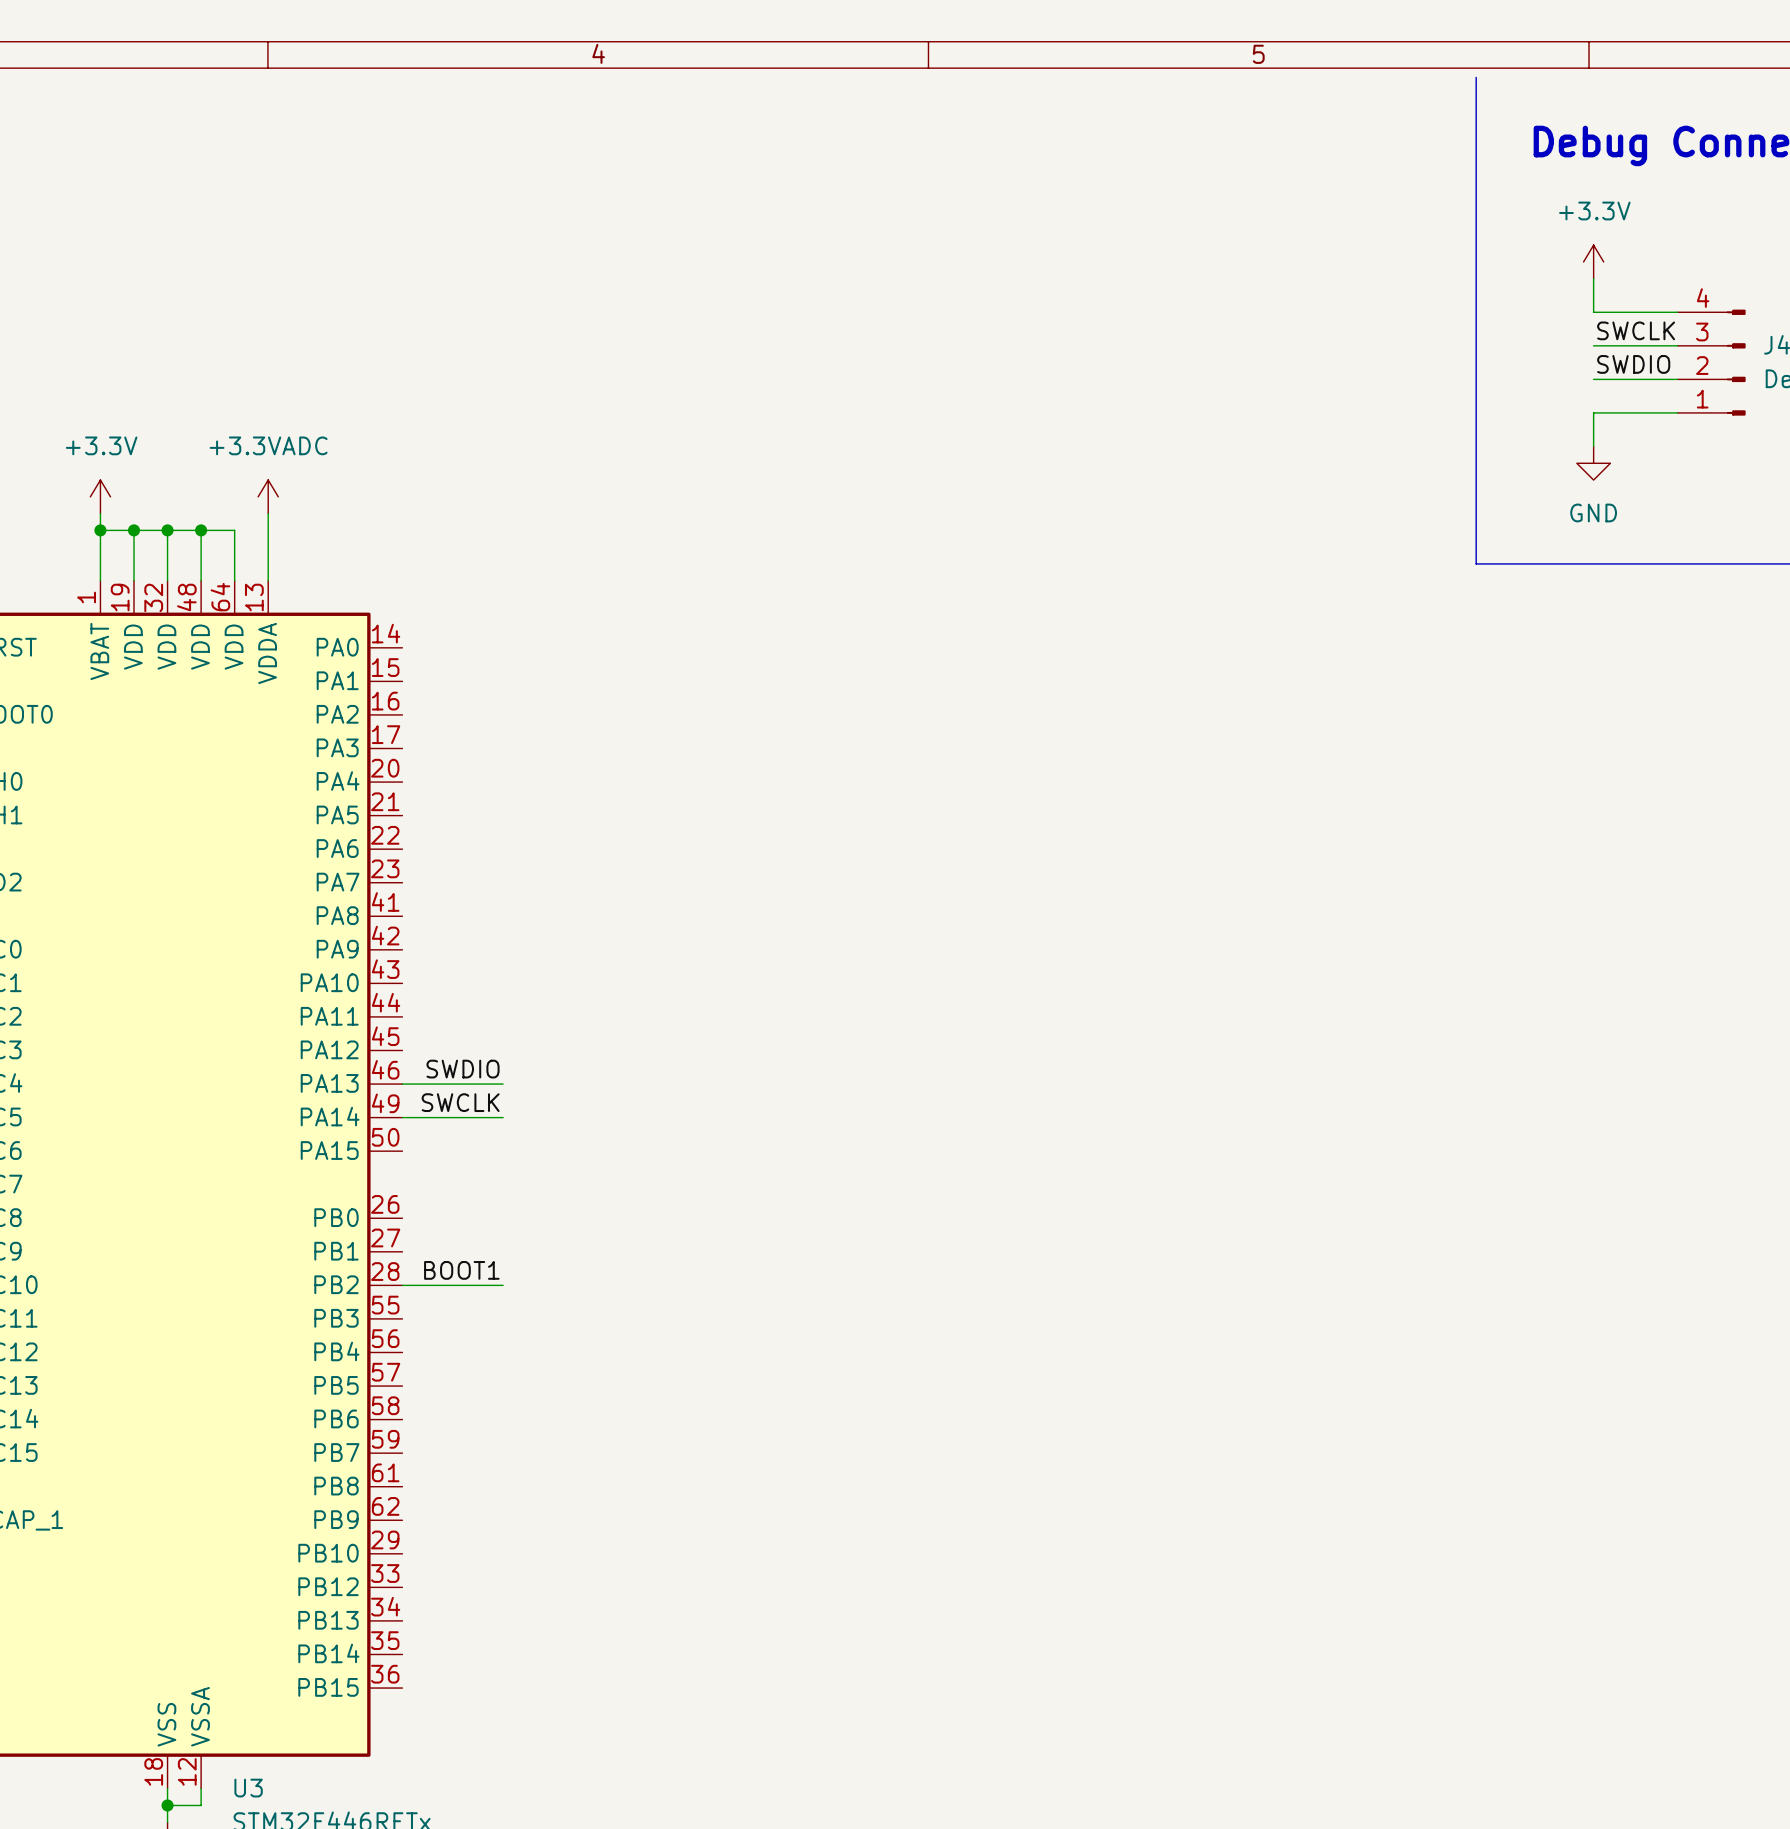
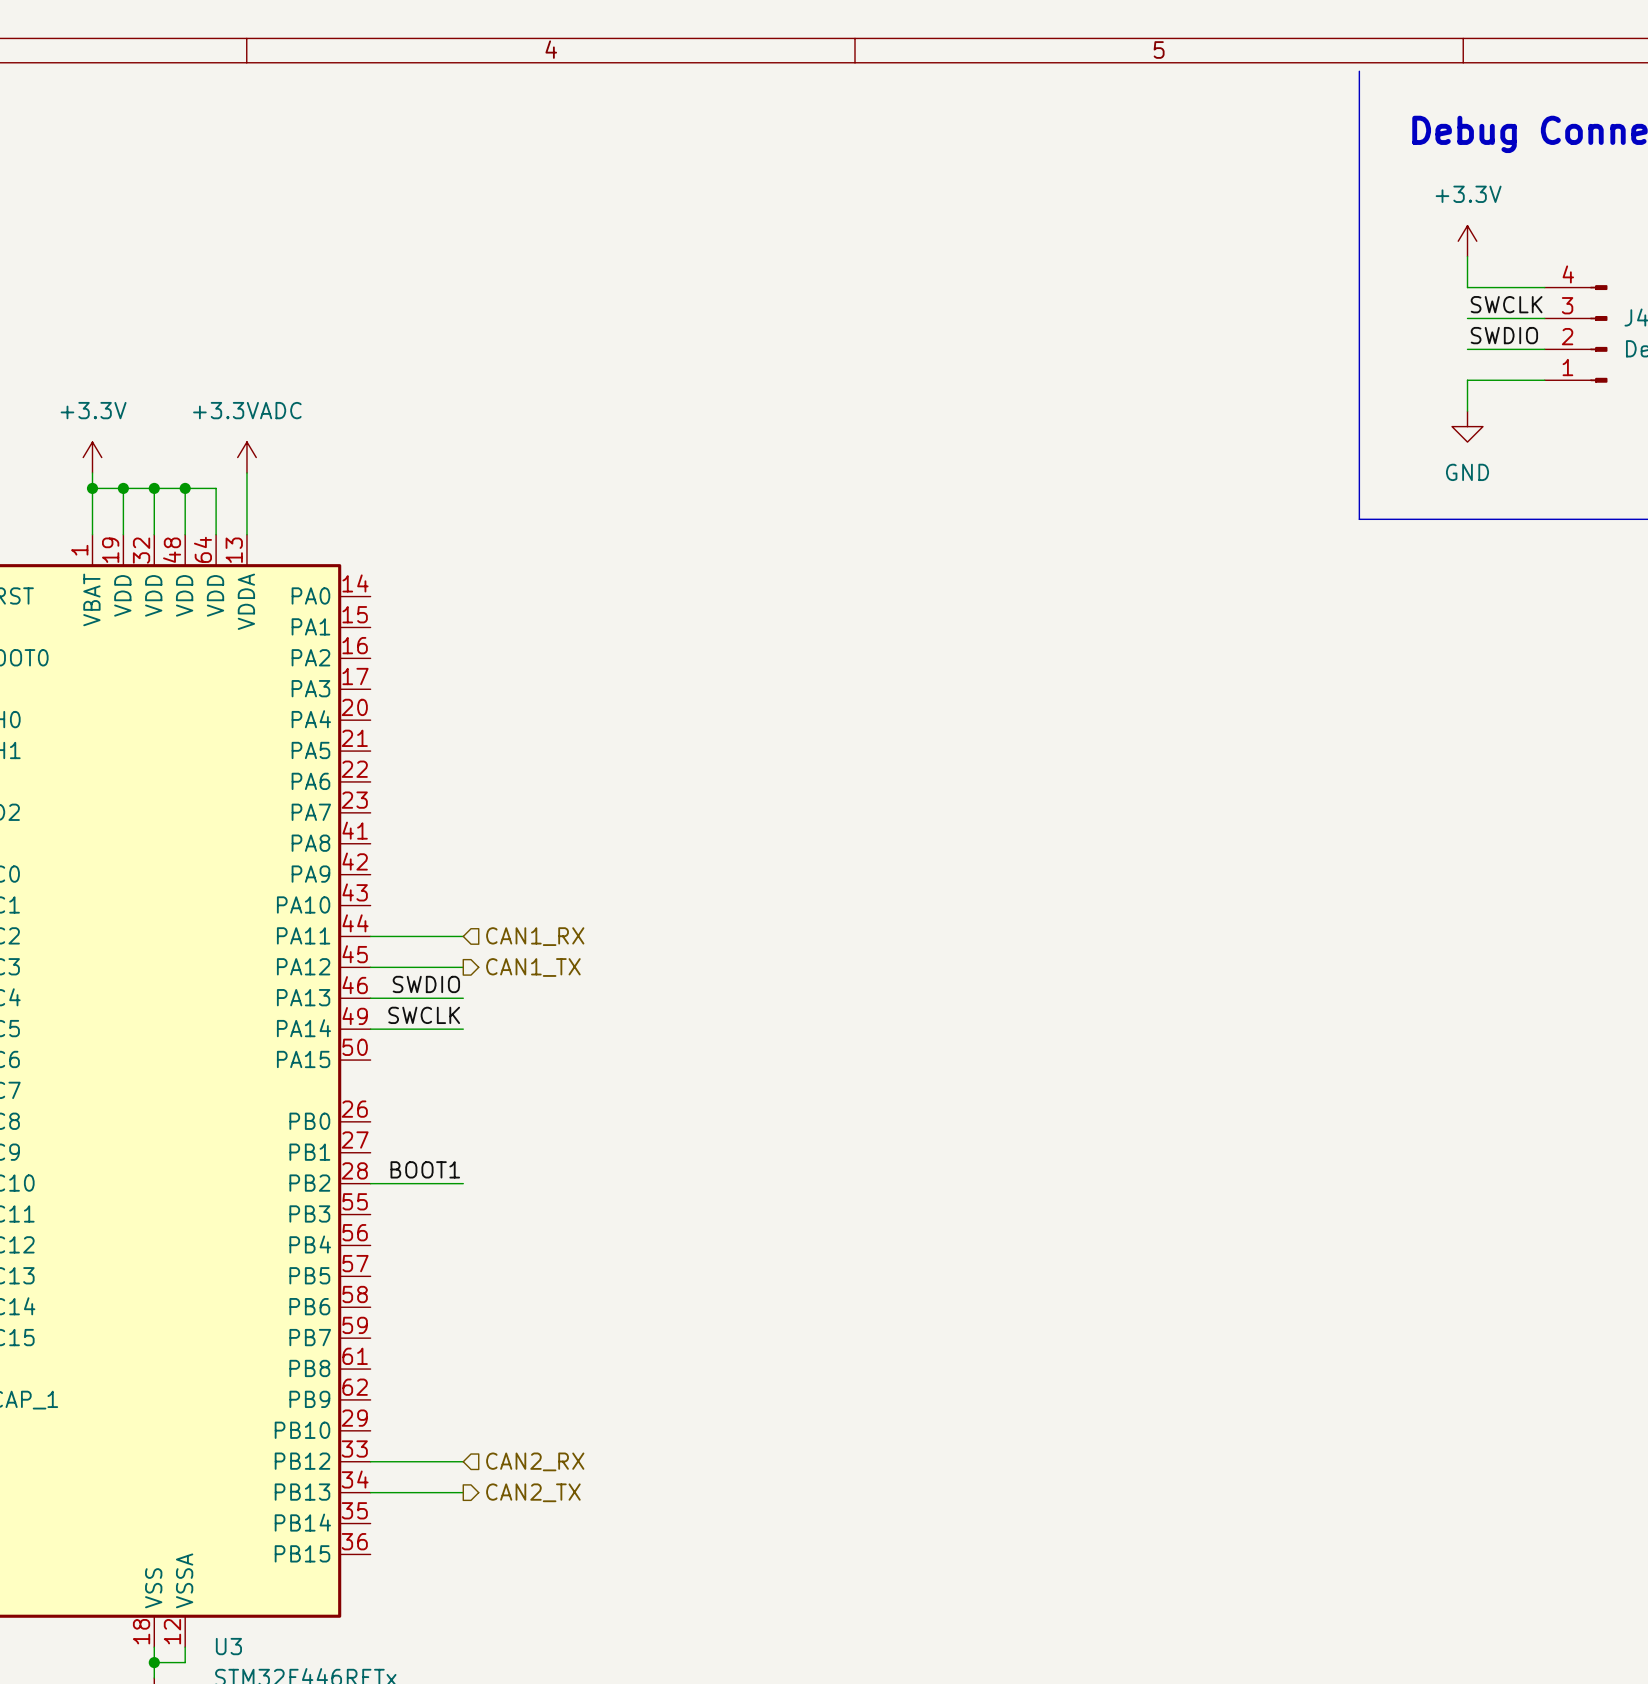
wire: none -> (370, 936) (463, 936)
hierarchical label: none -> CAN1_RX (535, 936)
wire: none -> (370, 967) (463, 967)
hierarchical label: none -> CAN1_TX (533, 967)
wire: none -> (370, 1461) (463, 1461)
hierarchical label: none -> CAN2_RX (535, 1461)
wire: none -> (370, 1492) (463, 1492)
hierarchical label: none -> CAN2_TX (533, 1492)

